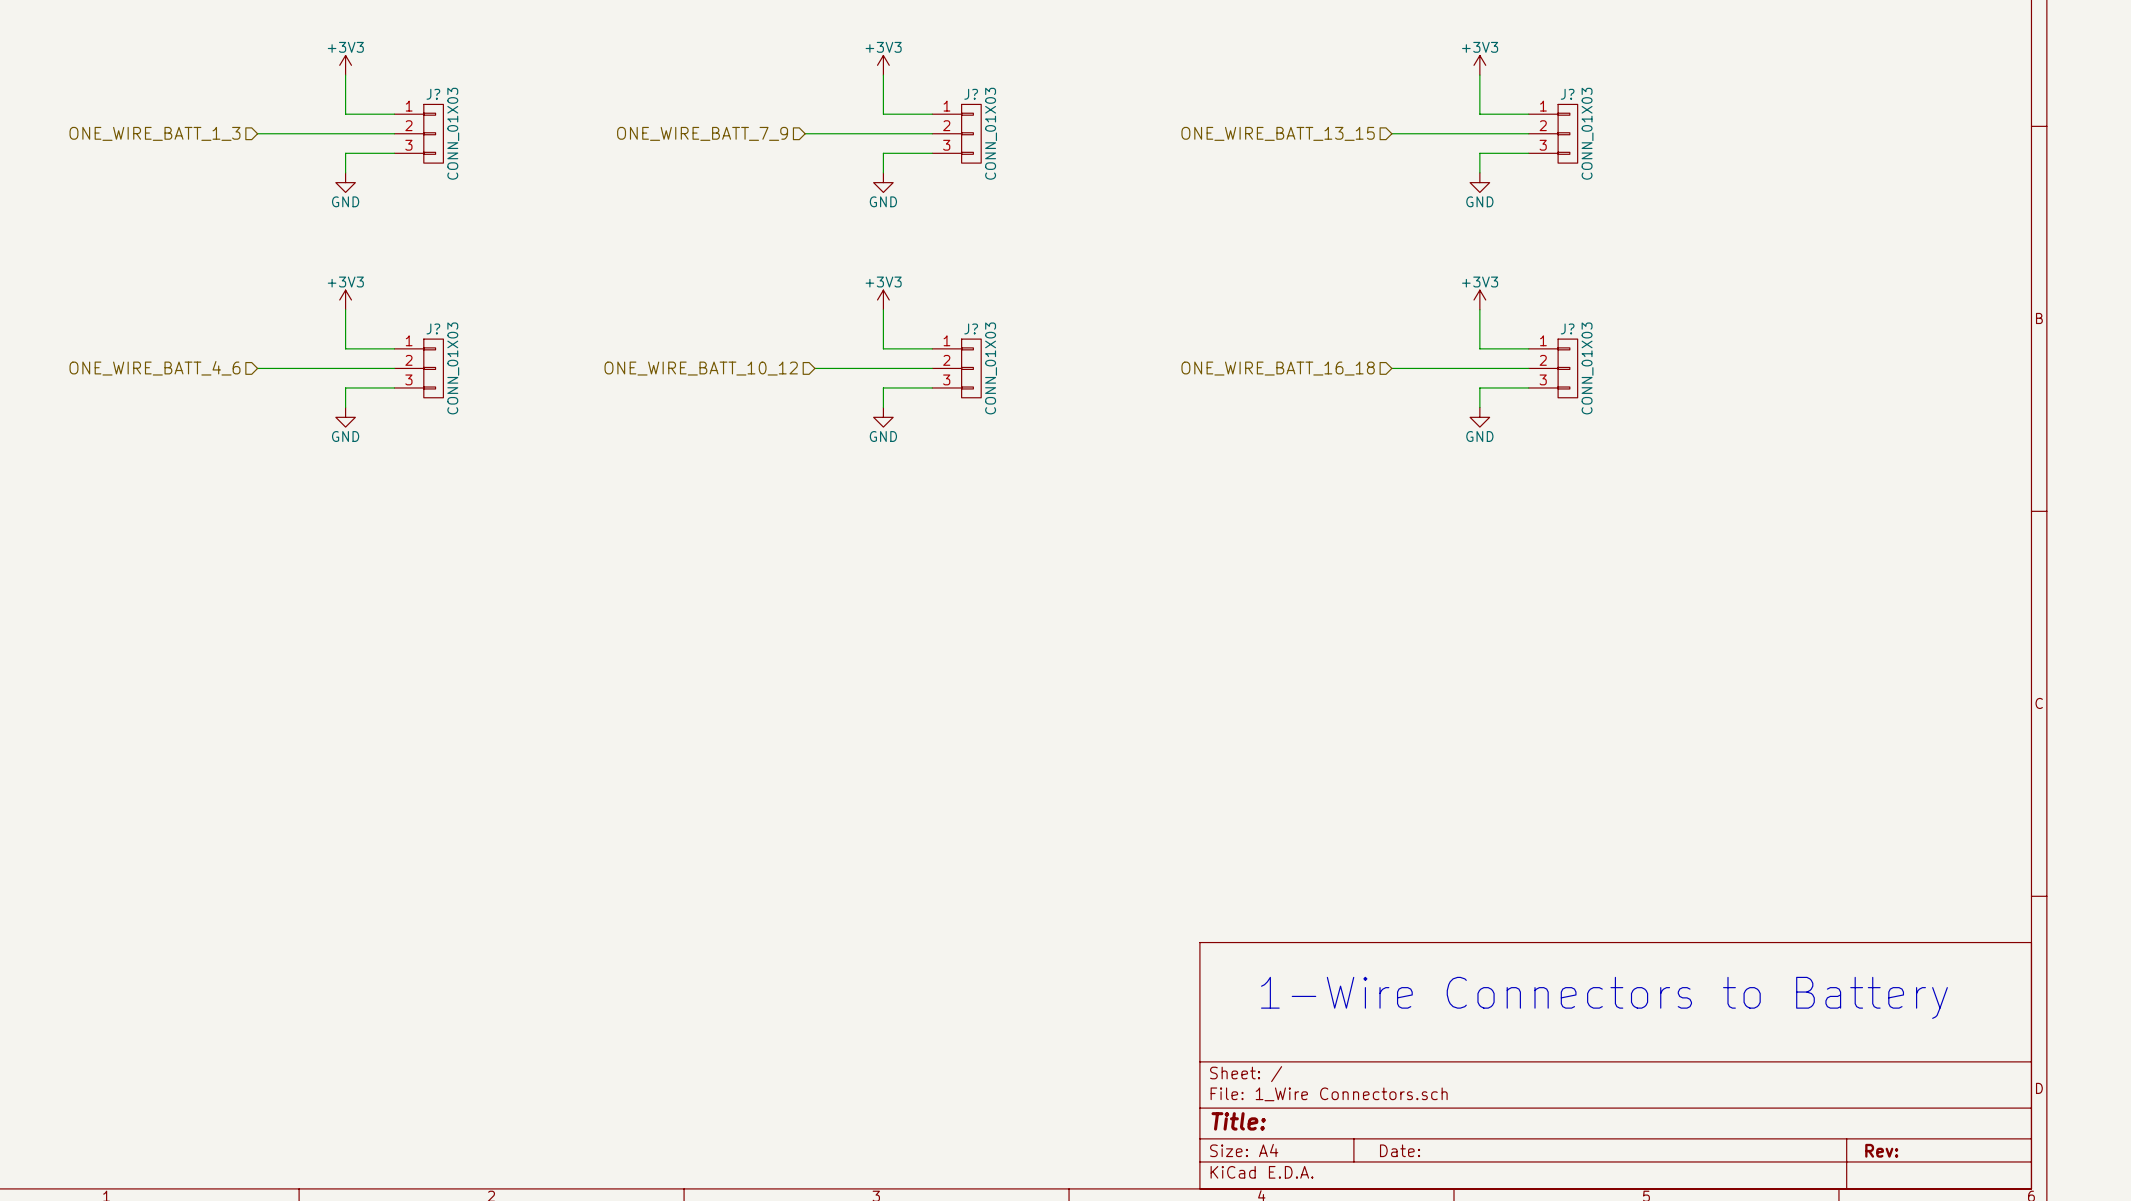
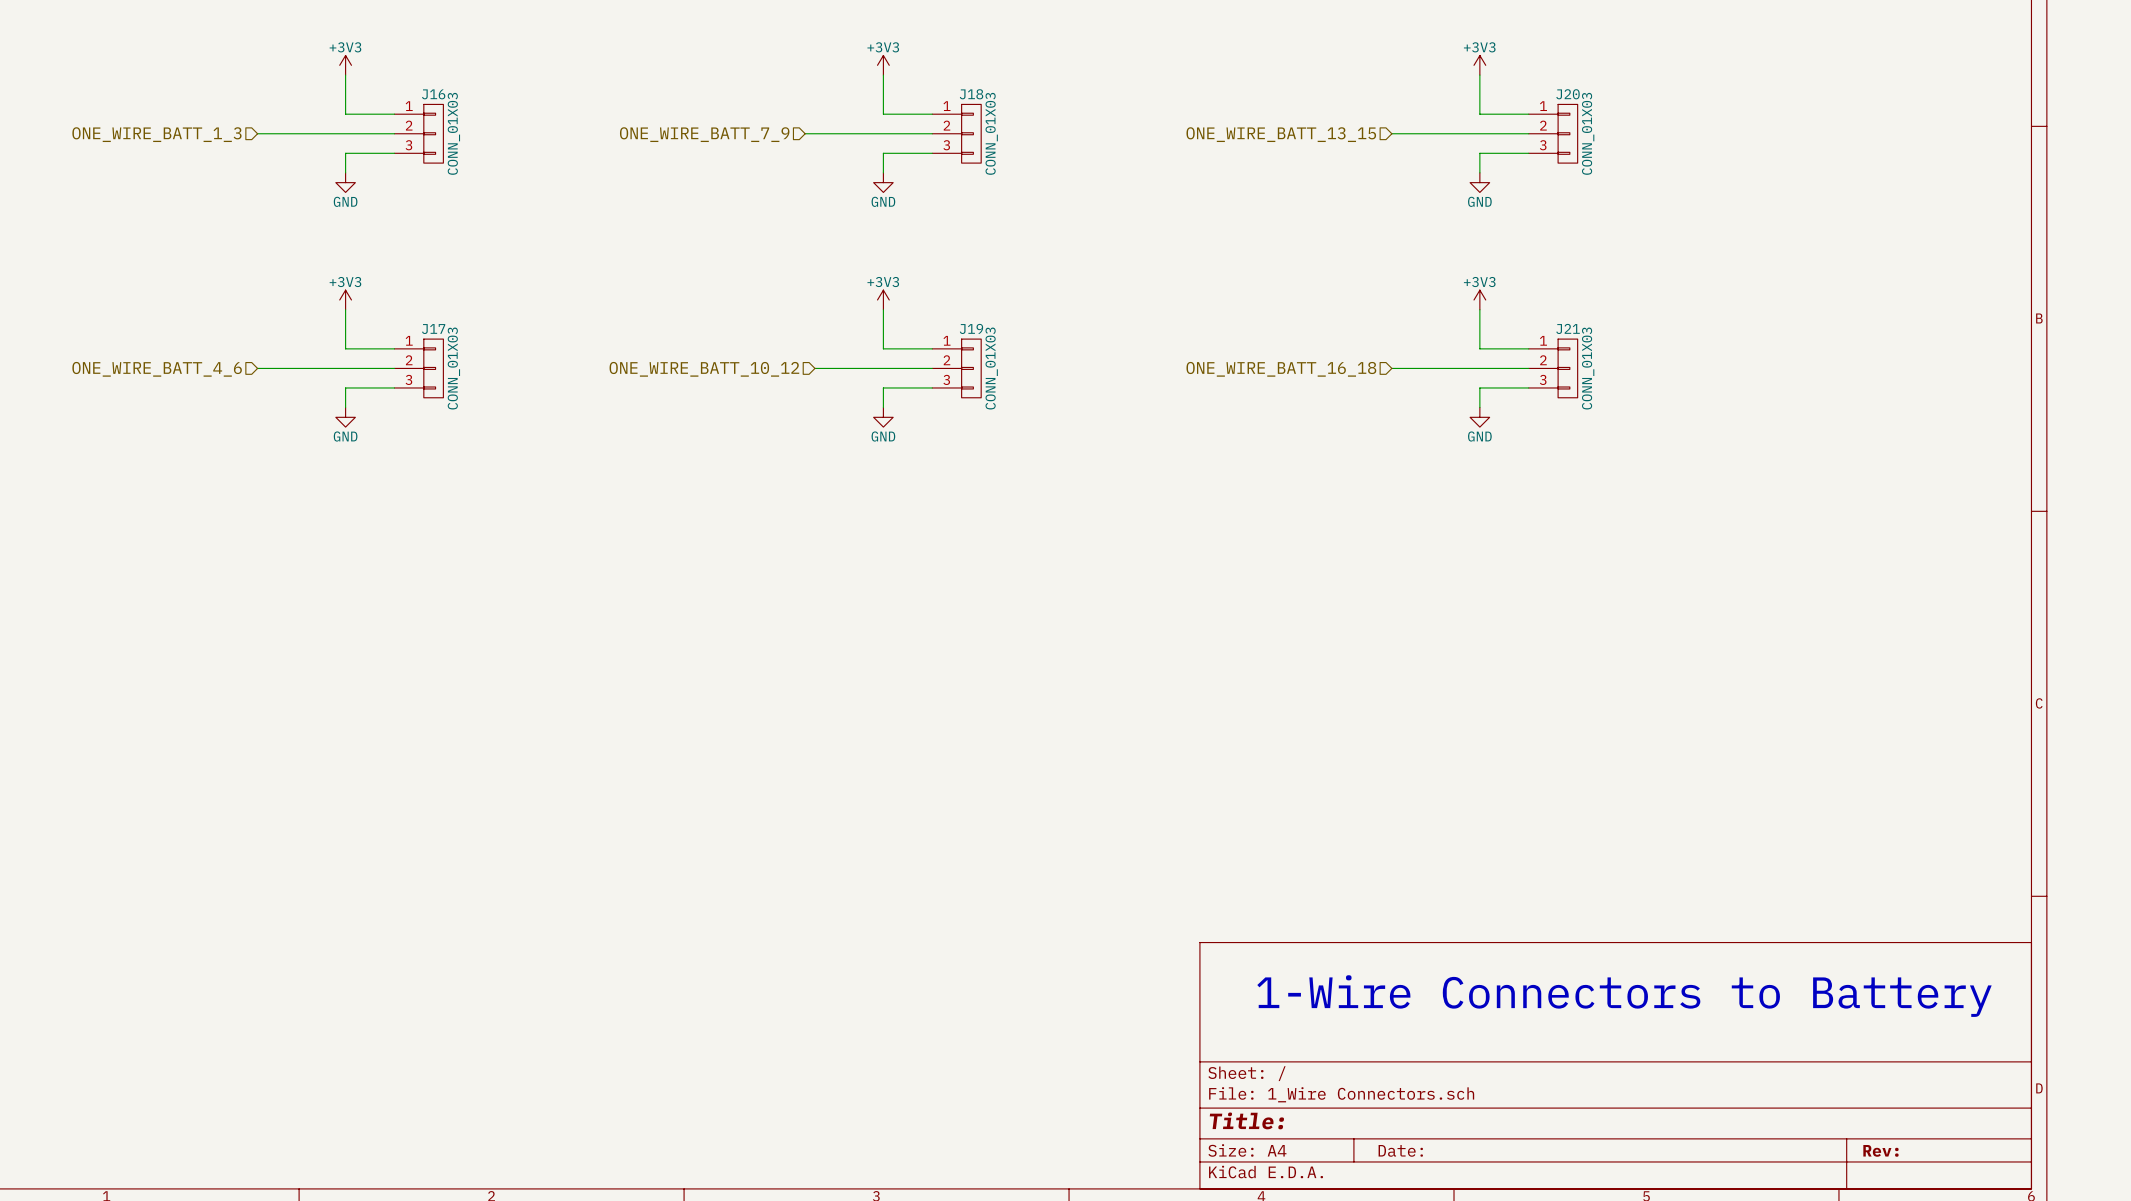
J? name: J? (433, 94) -> J16 (433, 94)
J? name: J? (971, 94) -> J18 (971, 94)
J? name: J? (1567, 94) -> J20 (1568, 94)
J? name: J? (433, 328) -> J17 (433, 329)
J? name: J? (971, 328) -> J19 (971, 328)
J? name: J? (1567, 328) -> J21 (1568, 328)

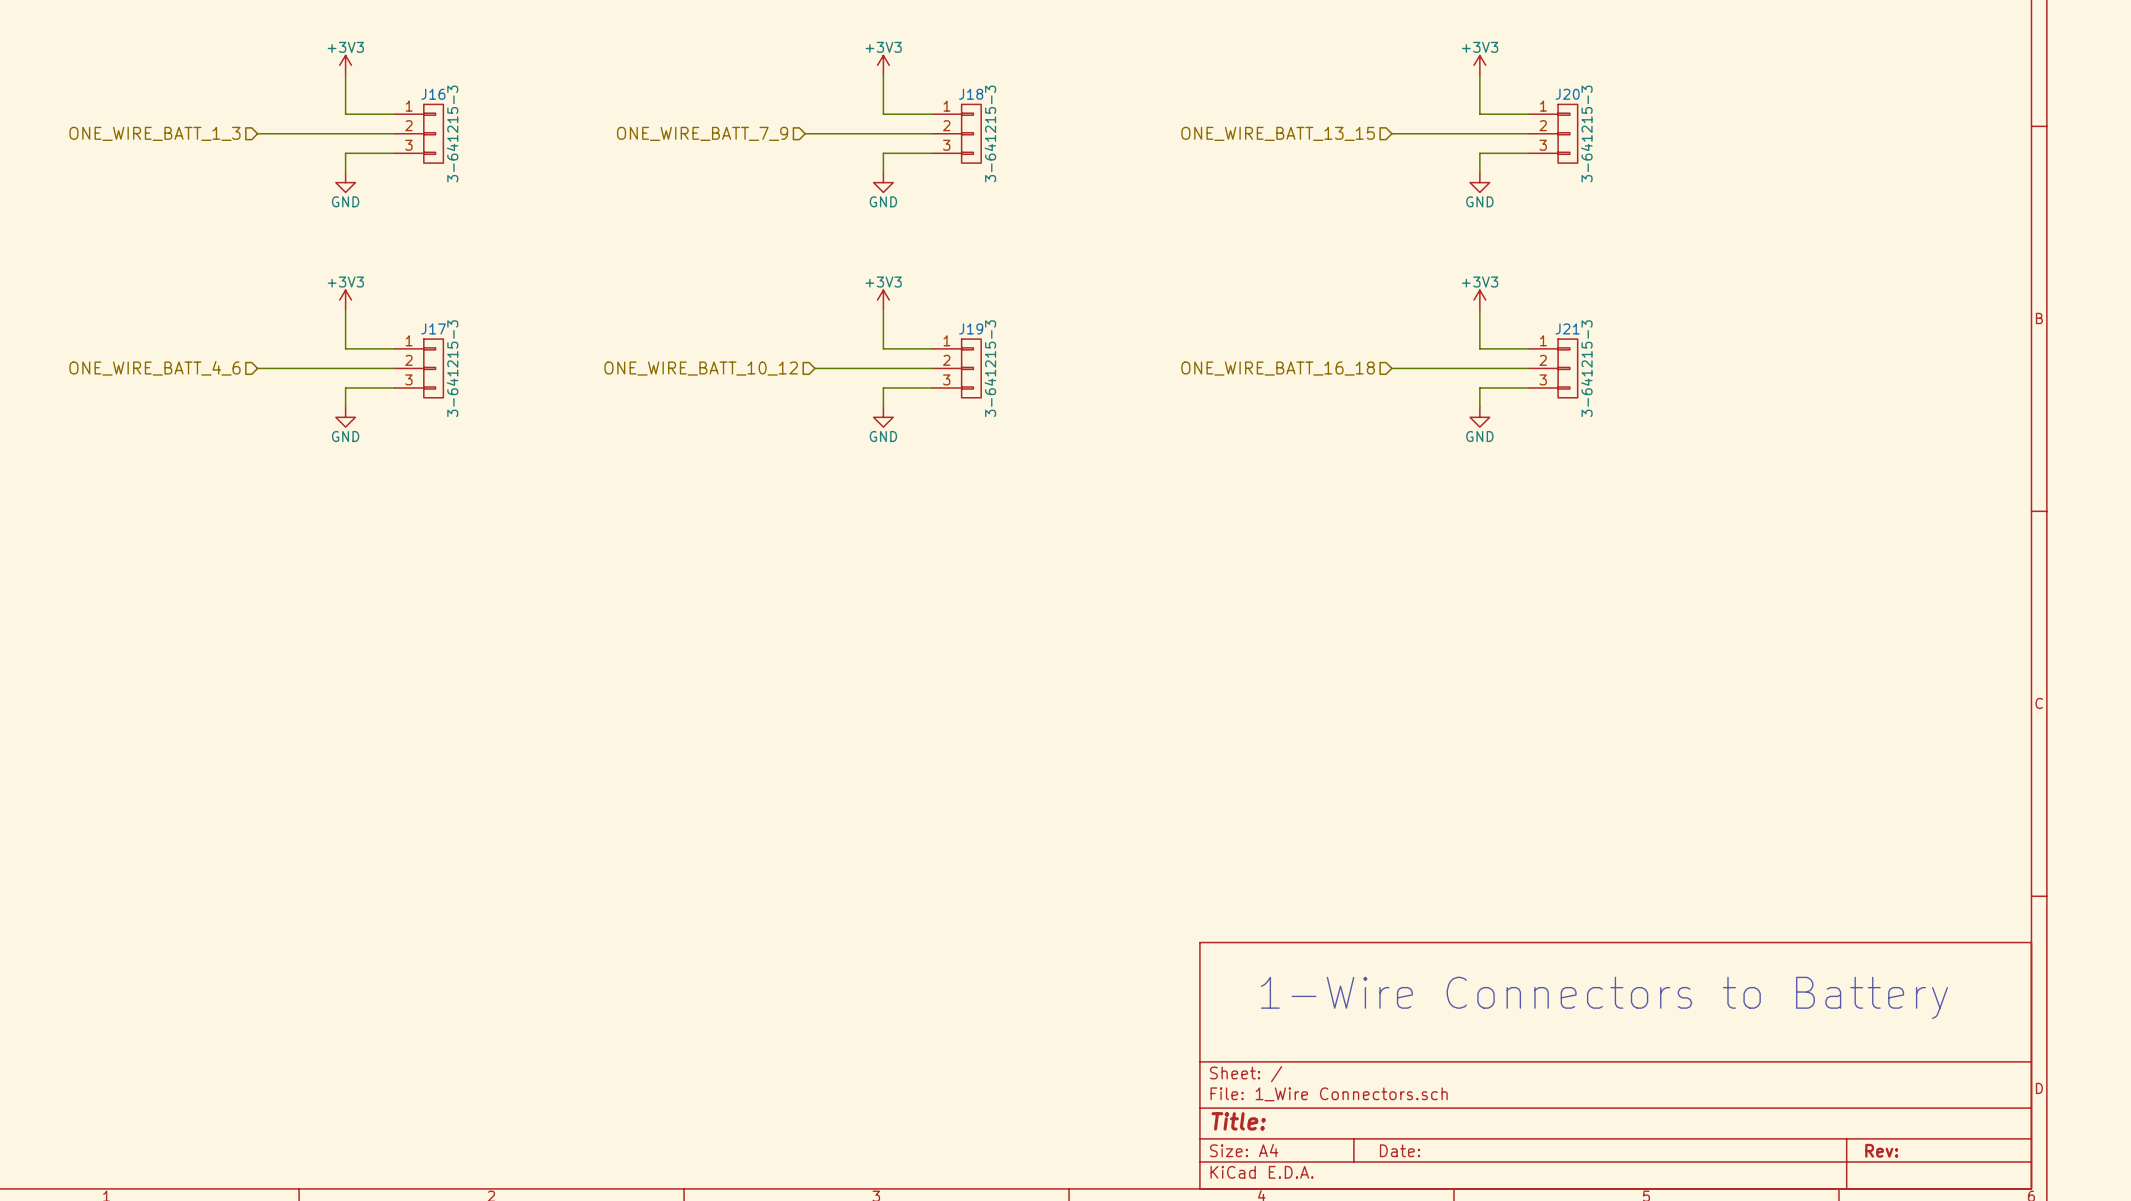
J16 value: CONN_01X03 (453, 133) -> 3-641215-3 (452, 133)
J18 value: CONN_01X03 (991, 133) -> 3-641215-3 (990, 133)
J20 value: CONN_01X03 (1588, 133) -> 3-641215-3 (1586, 133)
J17 value: CONN_01X03 (453, 368) -> 3-641215-3 (452, 368)
J19 value: CONN_01X03 (991, 368) -> 3-641215-3 (990, 368)
J21 value: CONN_01X03 (1588, 368) -> 3-641215-3 (1586, 368)

